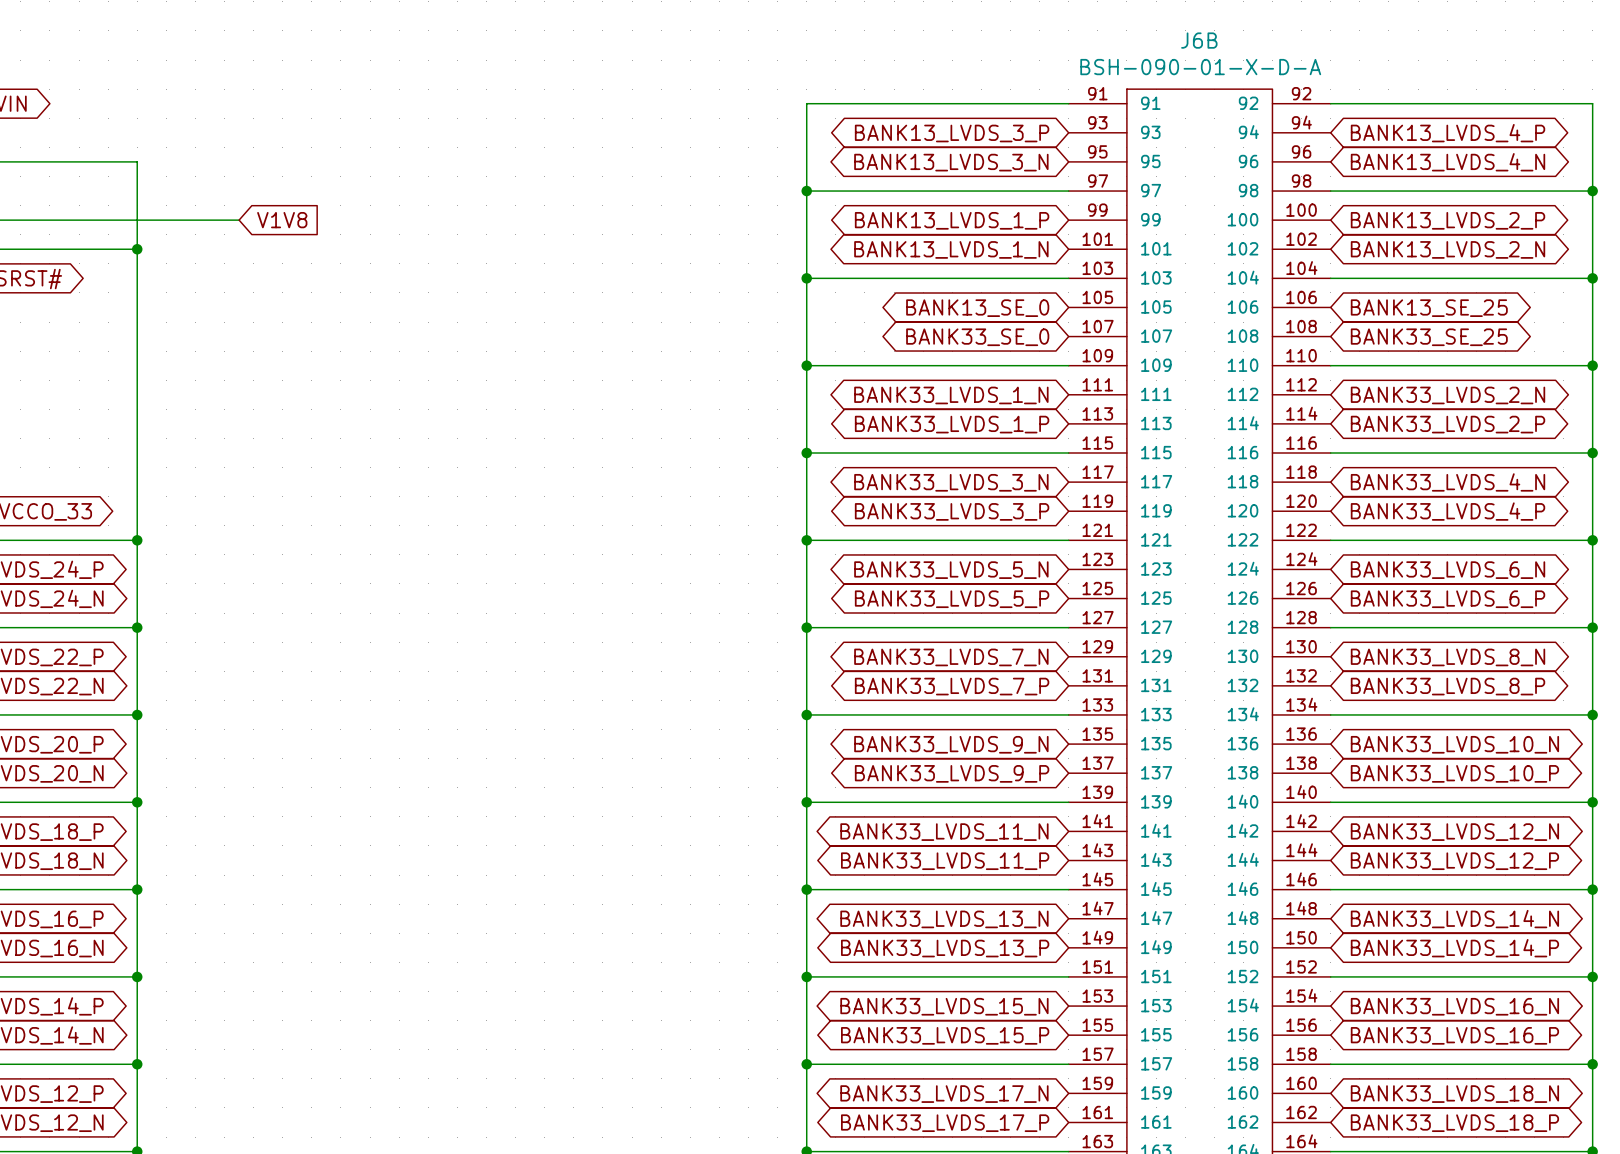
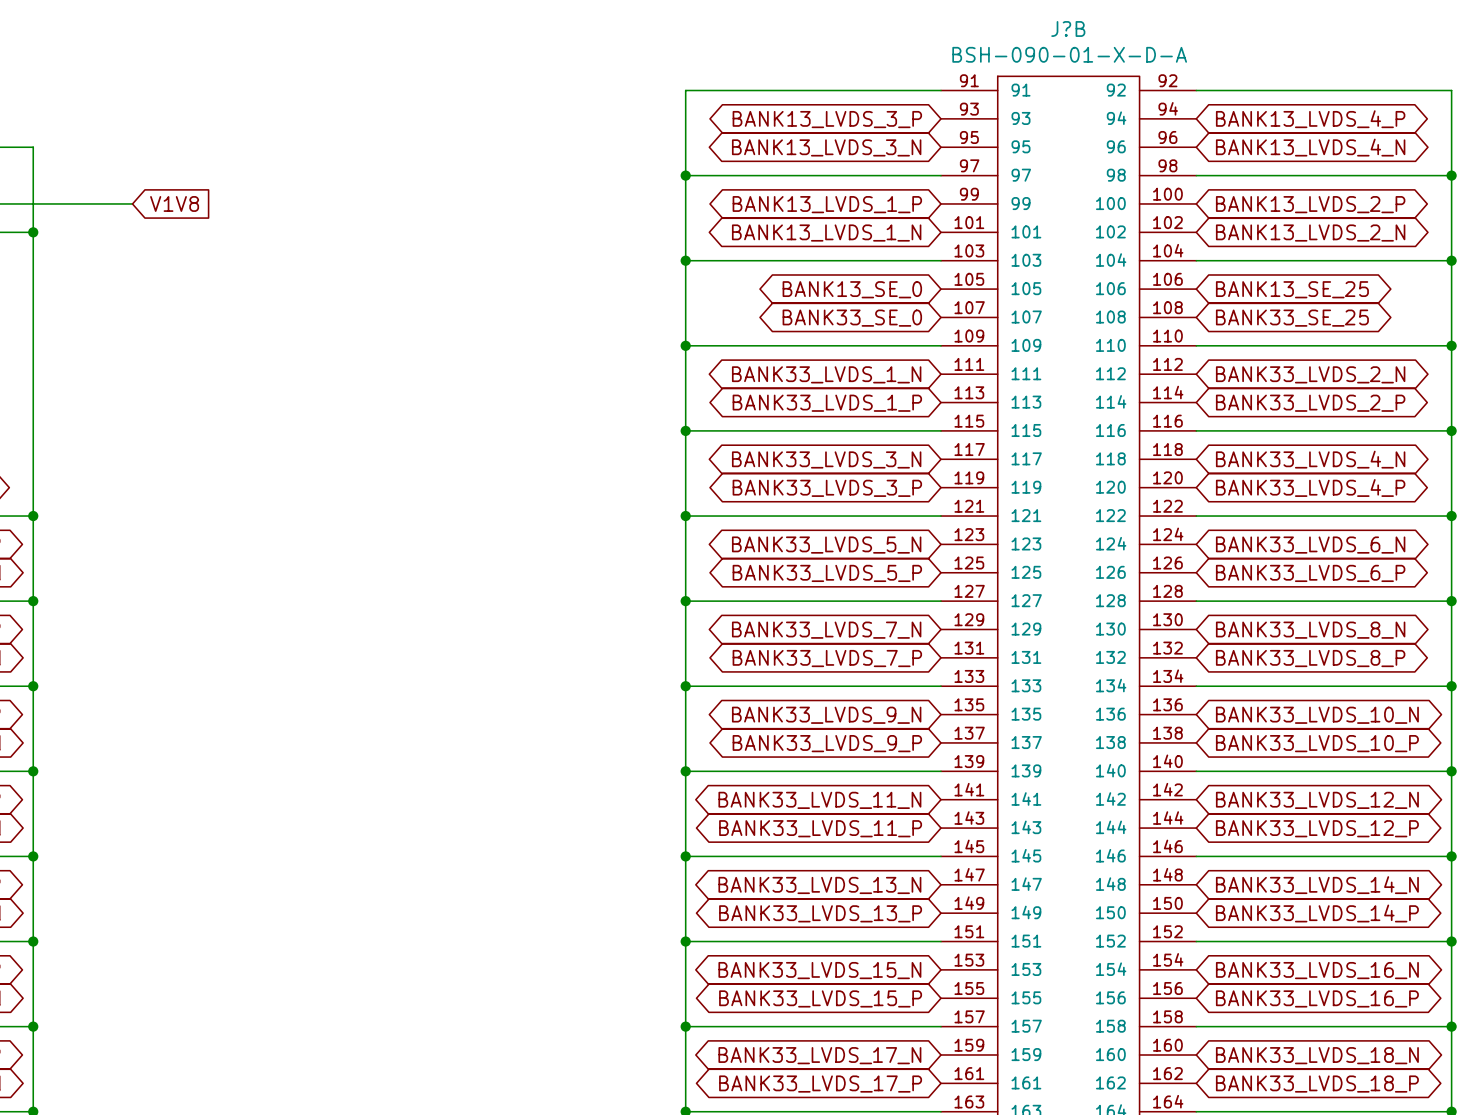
J6B name: J6B (1199, 40) -> J?B (1068, 28)

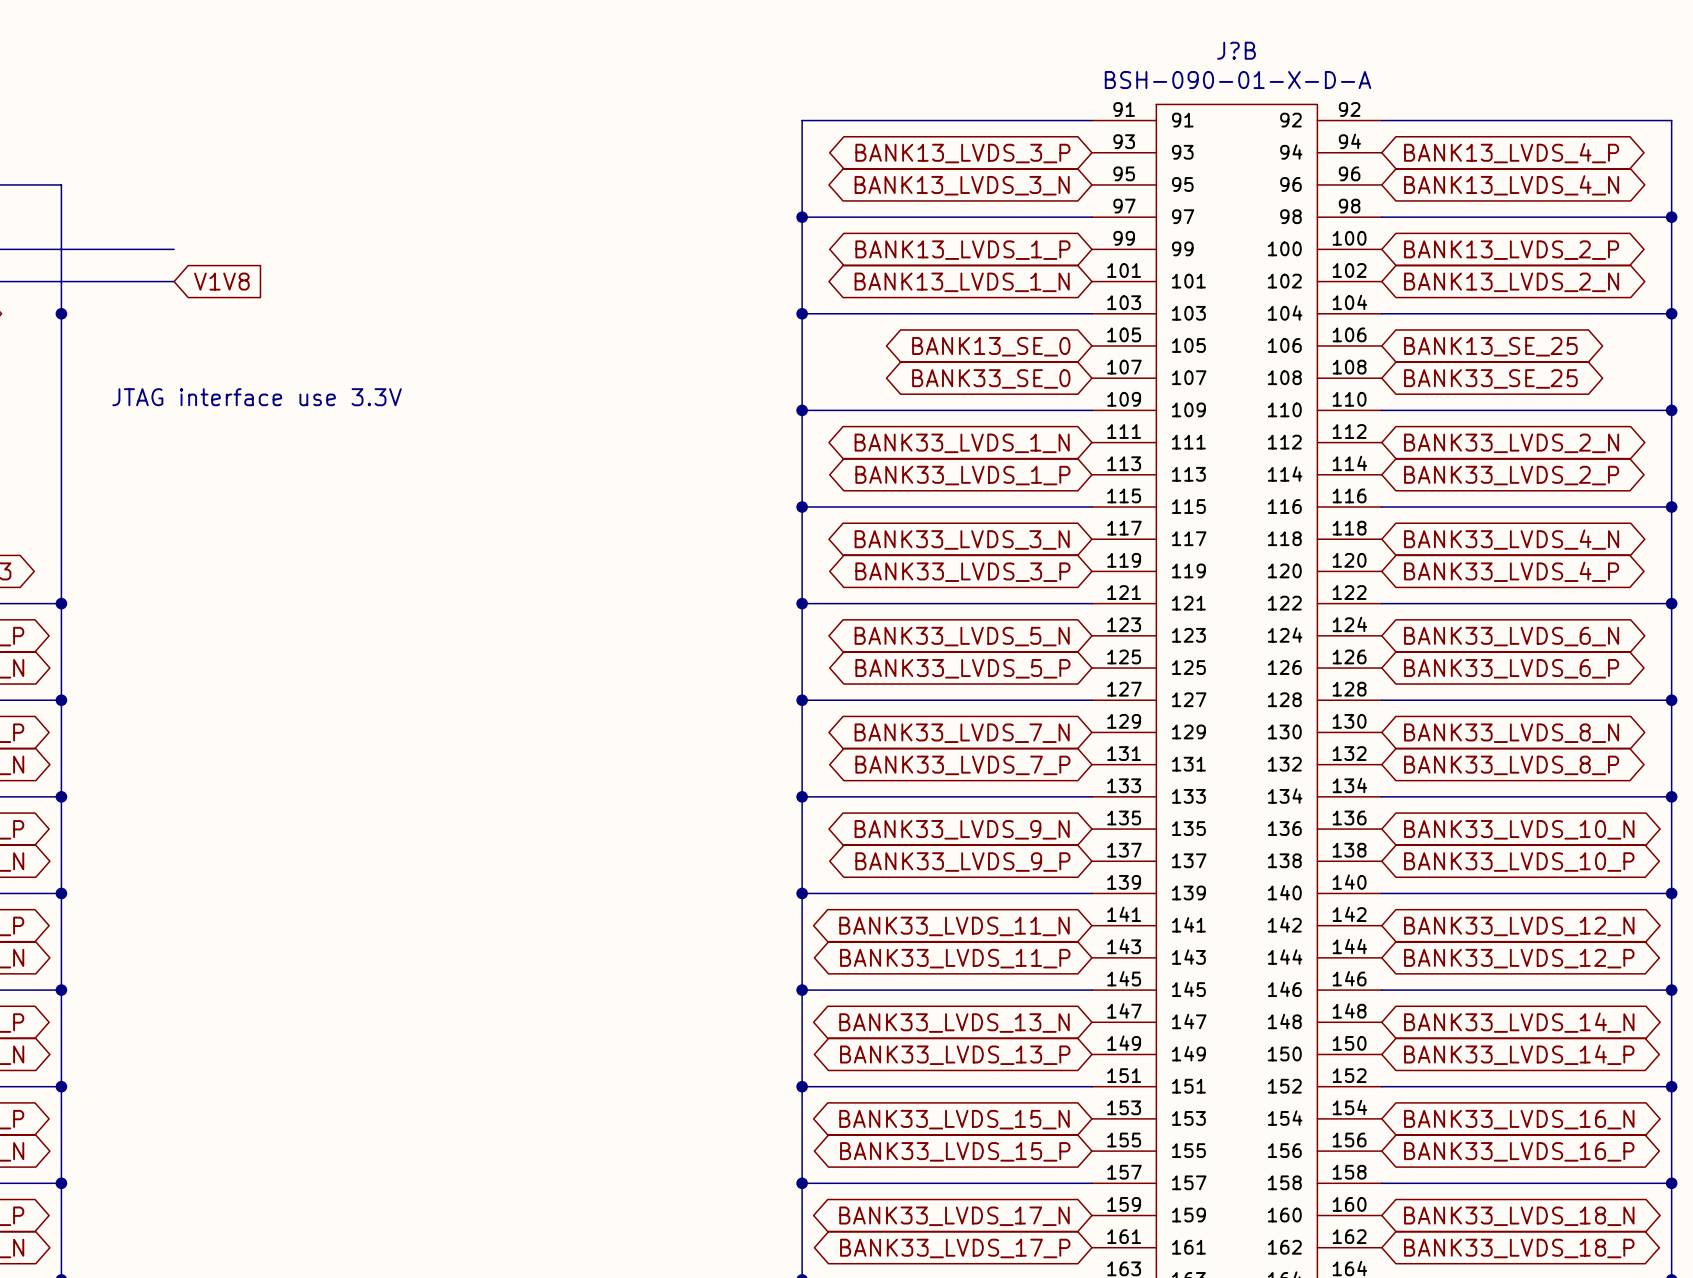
global label position: V1V8 (174, 203) -> V1V8 (221, 281)
wire: none -> (61, 281) (174, 281)
junction position: (33, 232) -> (61, 313)
text: none -> JTAG interface use 3.3V (257, 397)

